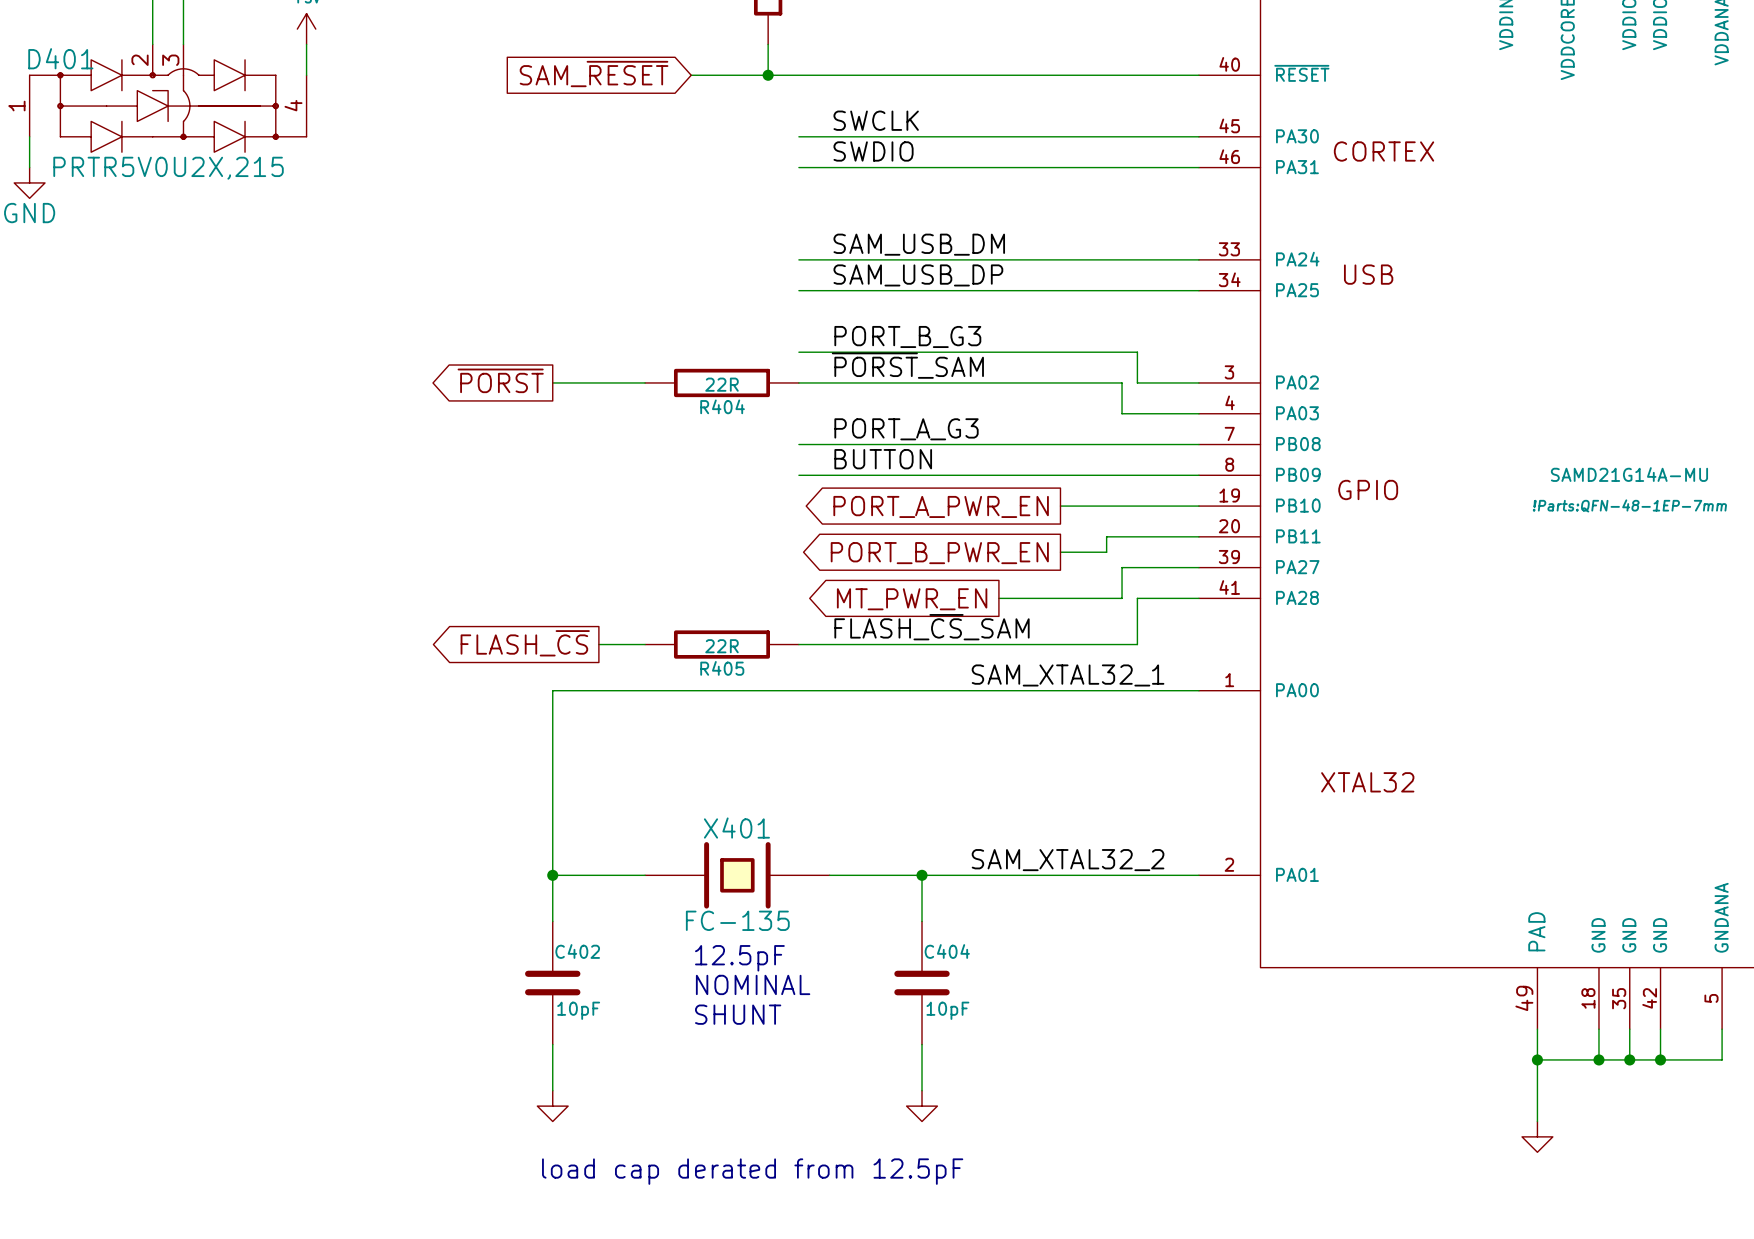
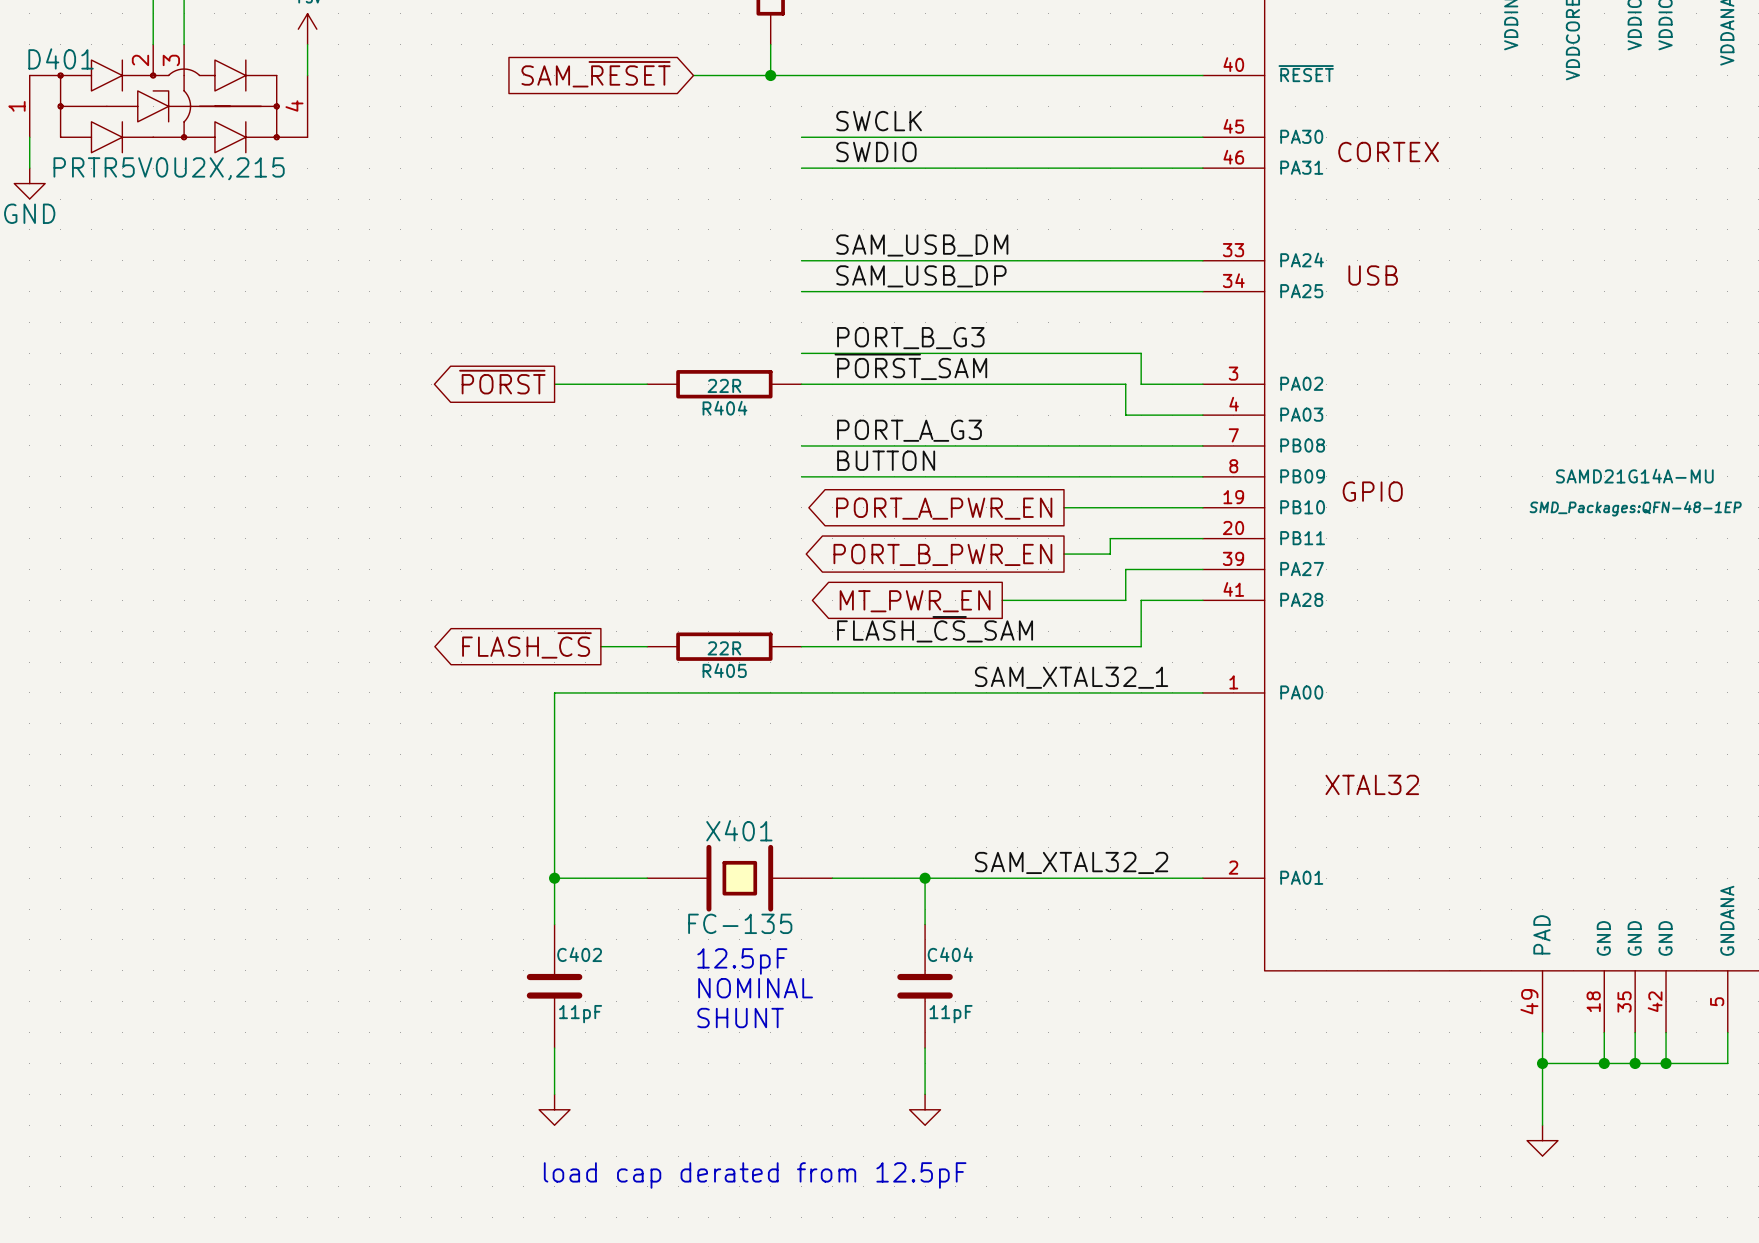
part text: !Parts:QFN-48-1EP-7mm (1629, 505) -> SMD_Packages:QFN-48-1EP (1635, 508)
C402 value: 10pF (578, 1010) -> 11pF (580, 1014)
C404 value: 10pF (947, 1010) -> 11pF (951, 1014)

